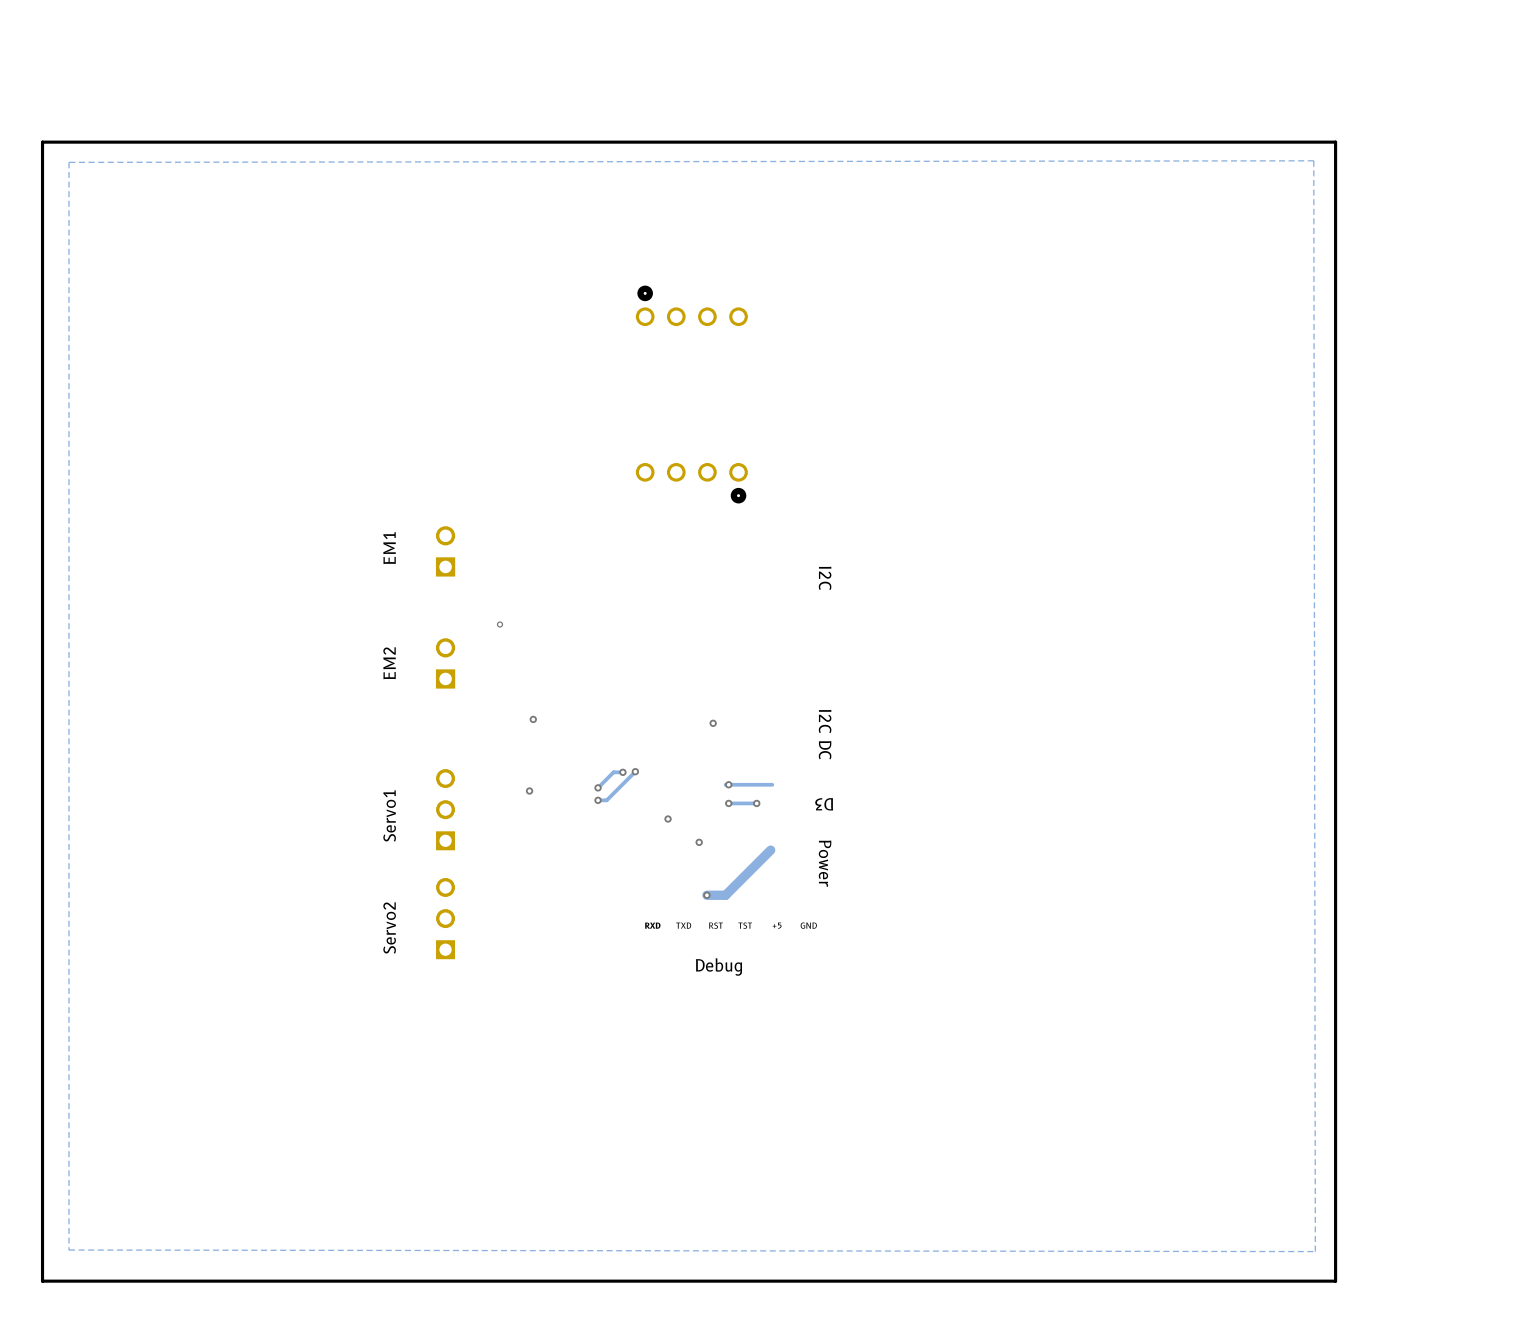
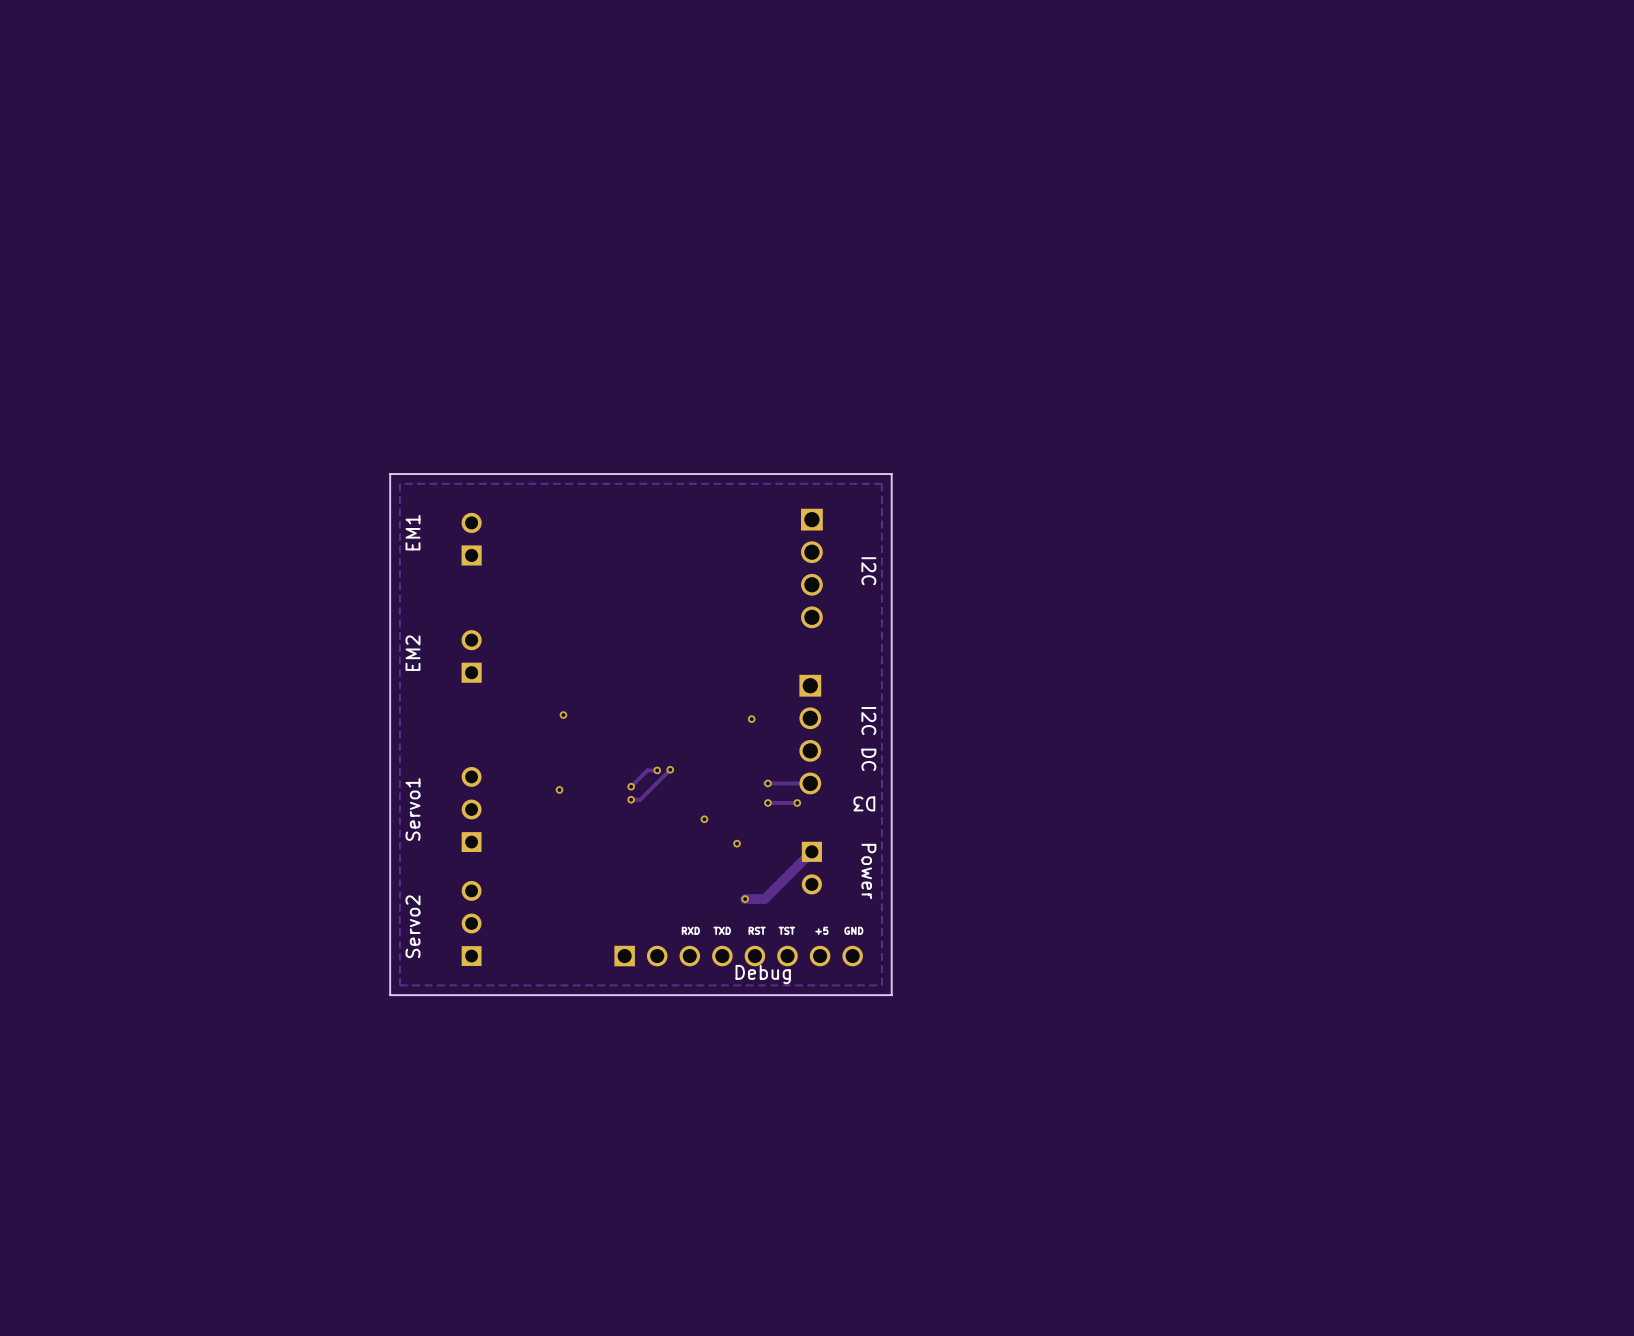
board edge: (1335, 142) (42, 142) (42, 1281) (1335, 1281) (1335, 142) -> none
zone outline: (1313, 160) (68, 162) (68, 1250) (1315, 1251) (1313, 160) -> none
part: (691, 305) -> none
part: (691, 483) -> none
board edge: none -> (891, 474) (390, 474) (390, 995) (891, 995) (891, 474)
zone outline: none -> (881, 483) (399, 483) (399, 985) (881, 985) (881, 483)
part: none -> (811, 568)
via: (499, 624) -> none
part: none -> (810, 734)
part: none -> (811, 868)
part: none -> (738, 956)

